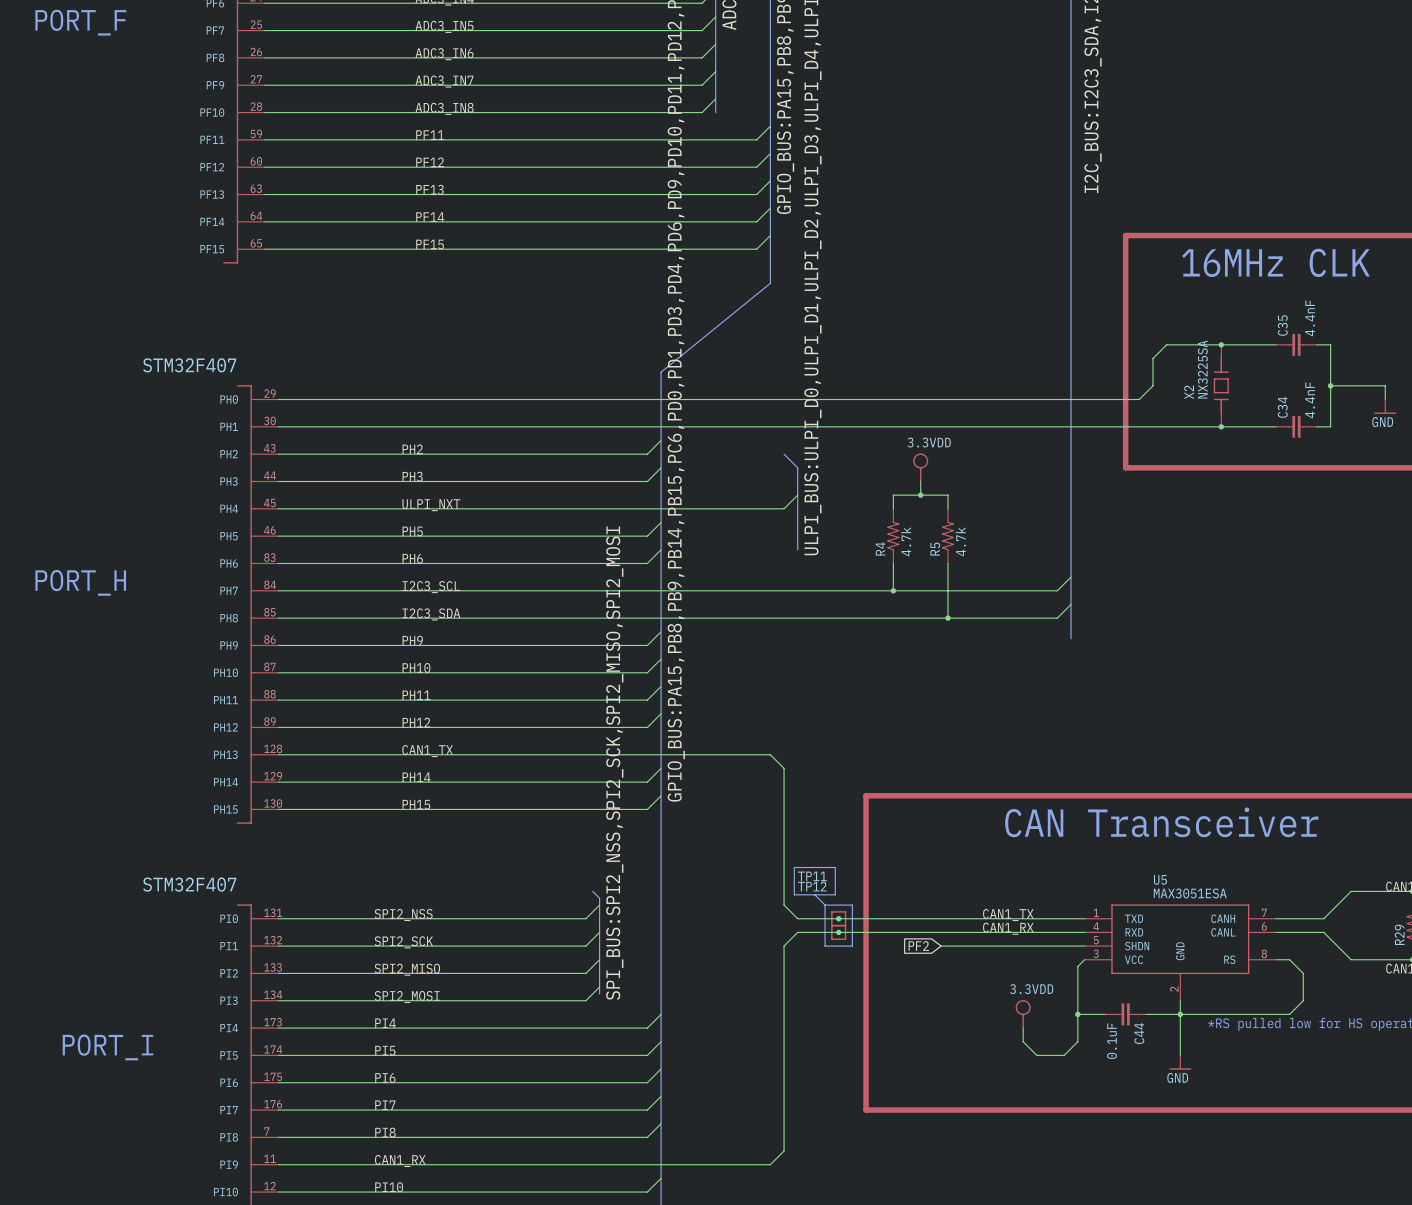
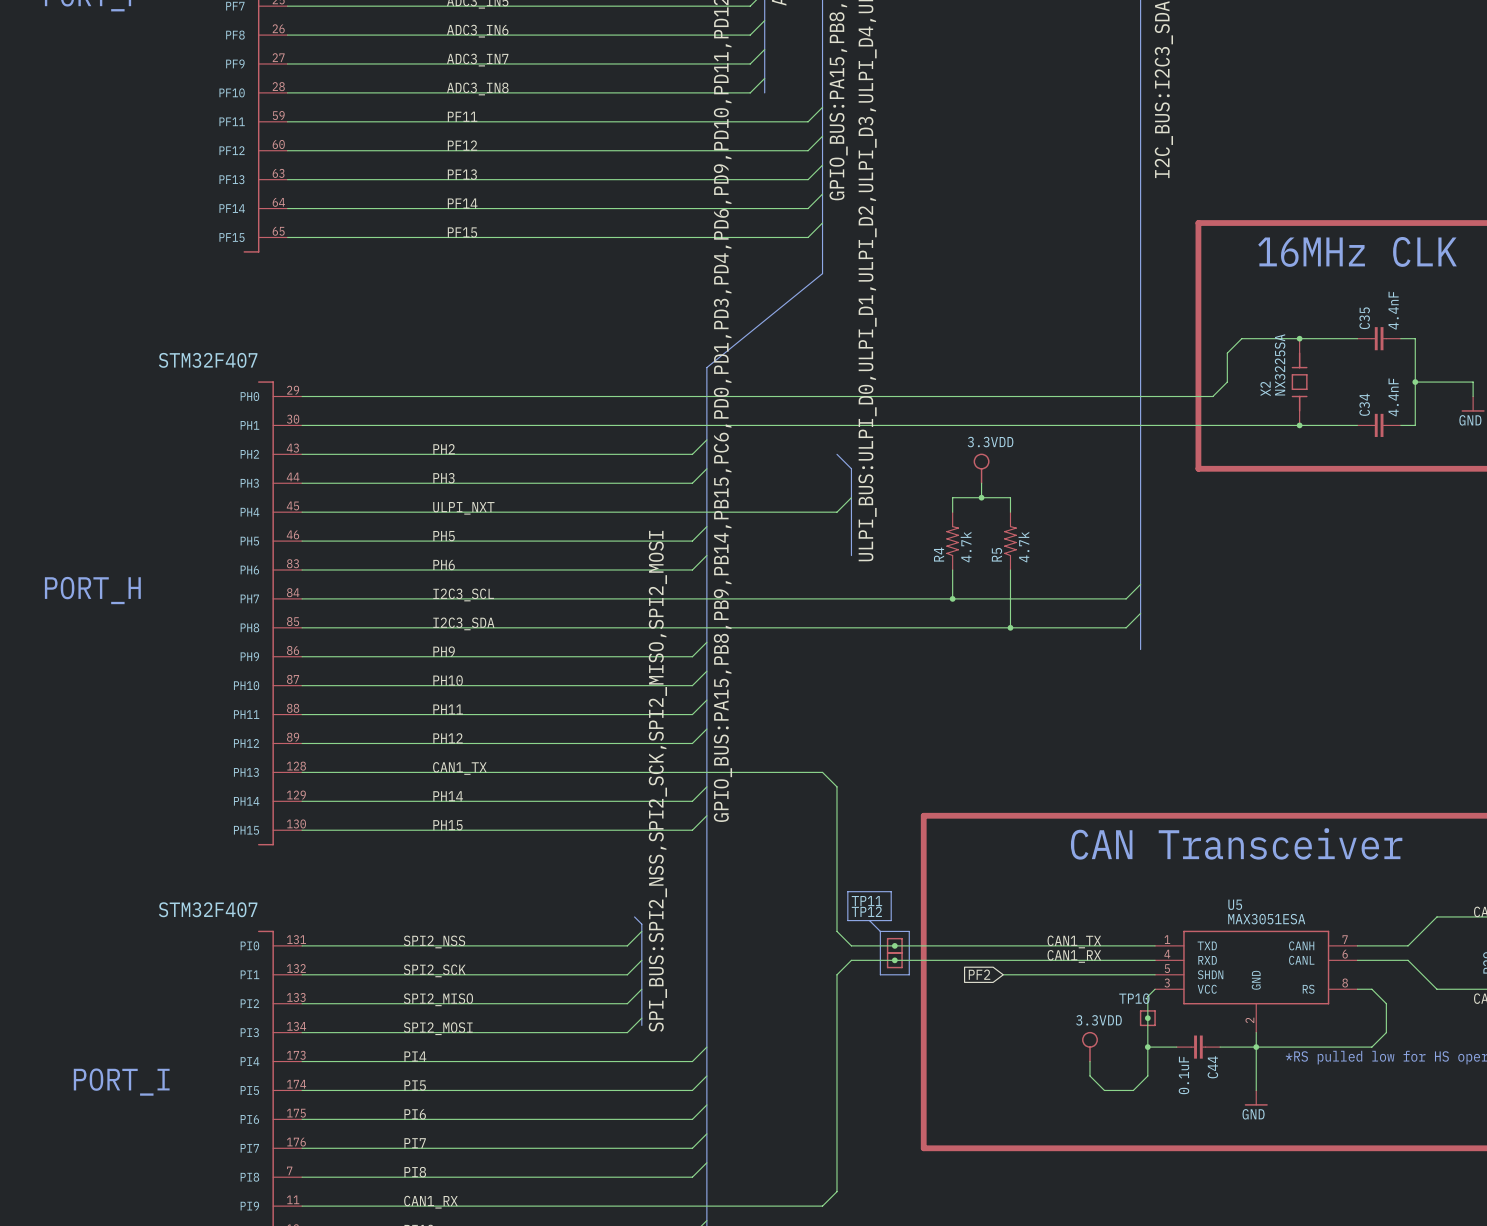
TP10: none -> (1147, 1018)
junction: none -> (1147, 1018)

